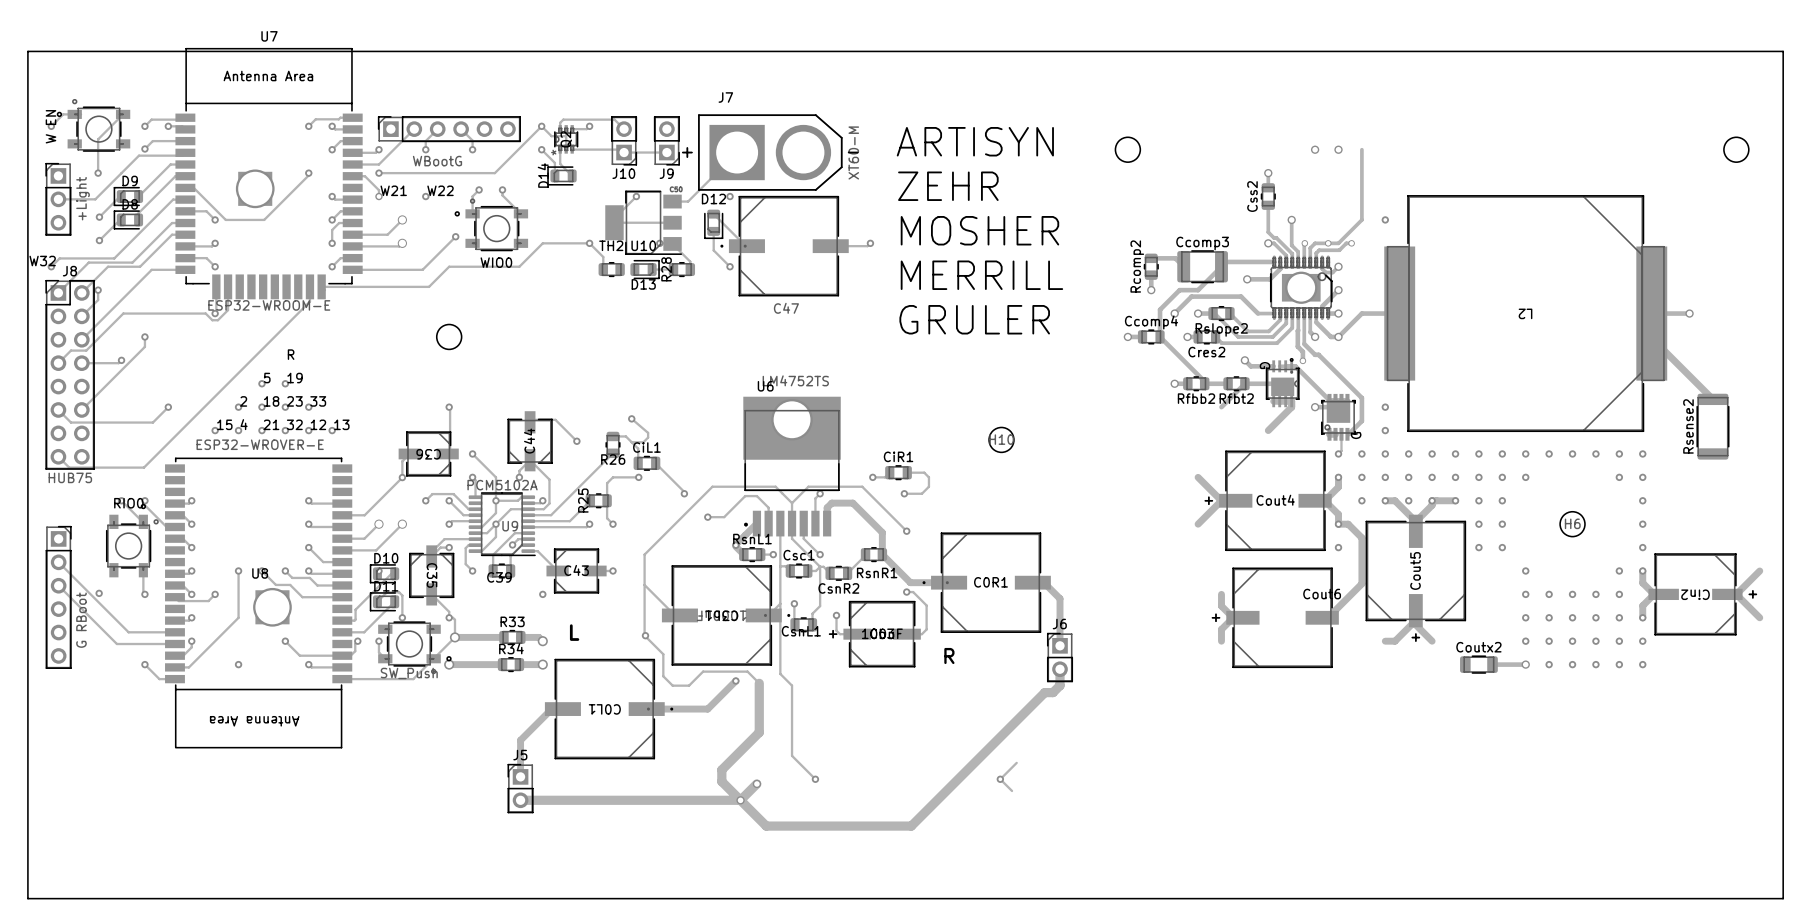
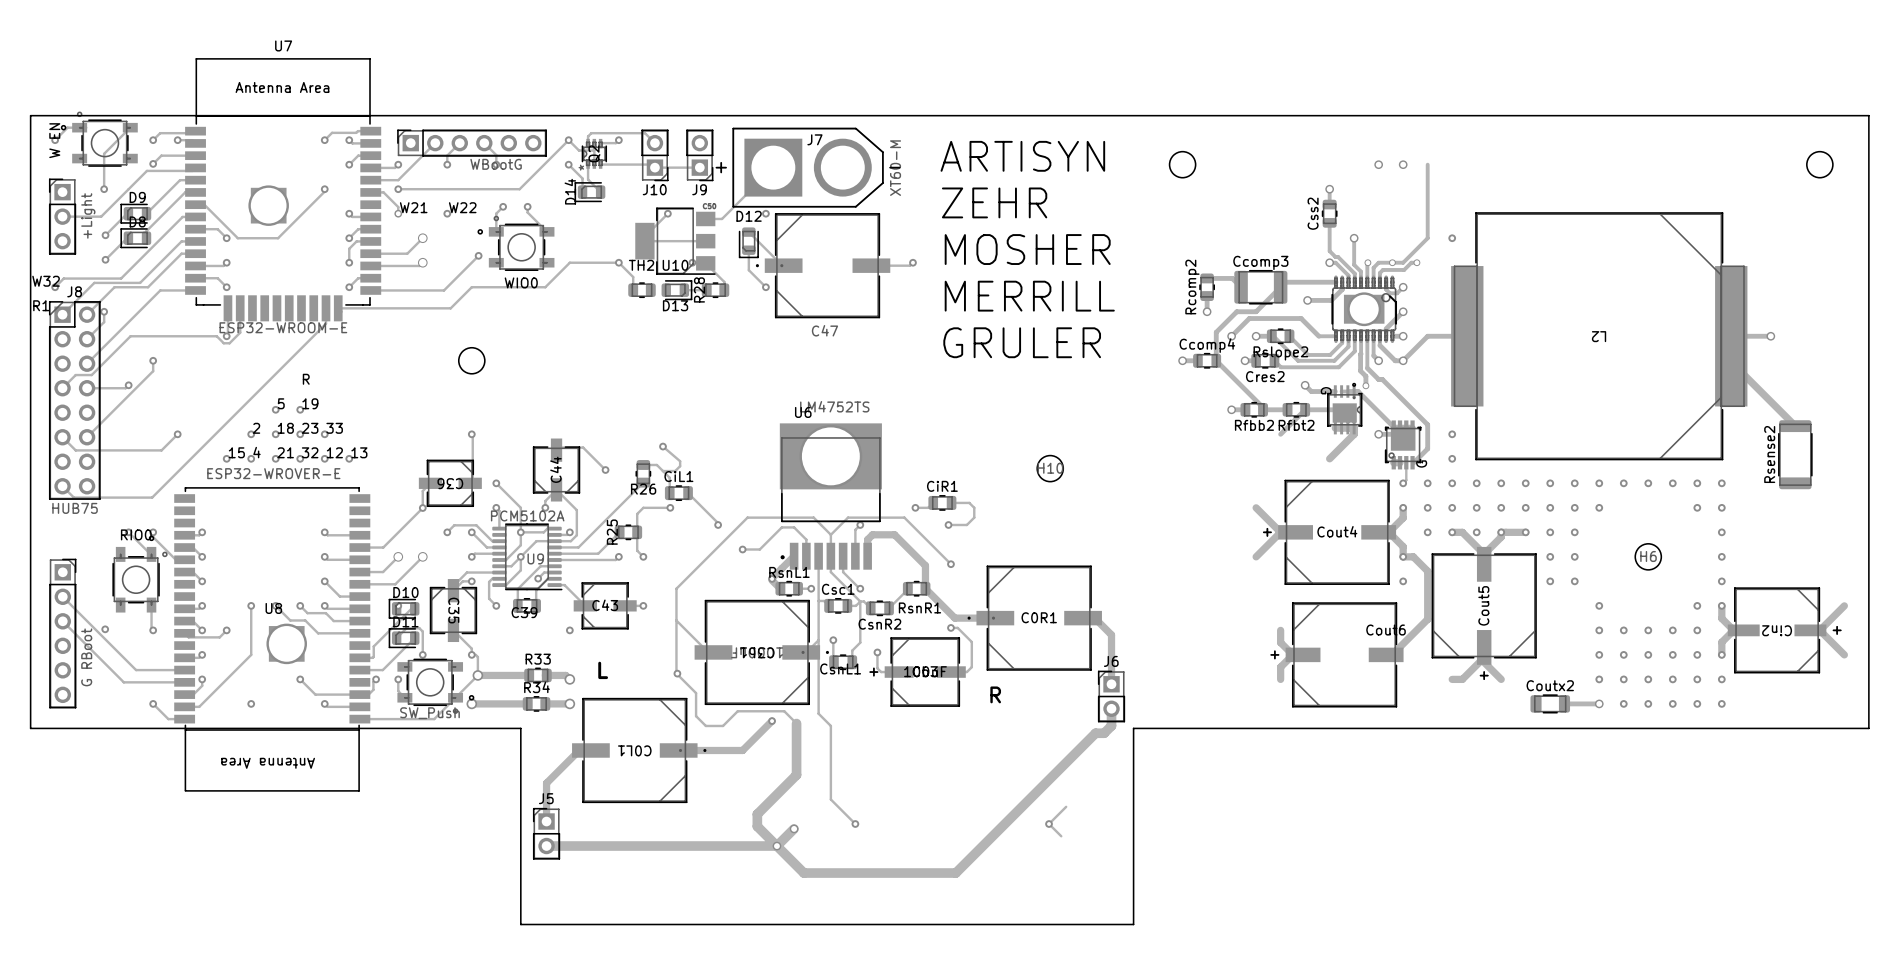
J7 name position: J7 (725, 97) -> J7 (814, 139)
board edge: (27, 102) (27, 51) (1783, 51) (1783, 102) -> (30, 115) (1868, 115)
part text position: WBootG (437, 161) -> WBootG (496, 164)
text: none -> R1 (41, 305)
via size: [771, 399, 813, 441] -> [799, 425, 863, 488]
board edge: (27, 688) (27, 898) (1783, 898) (1783, 688) -> (30, 728) (520, 728) (520, 924) (1133, 924) (1133, 728) (1868, 728)

